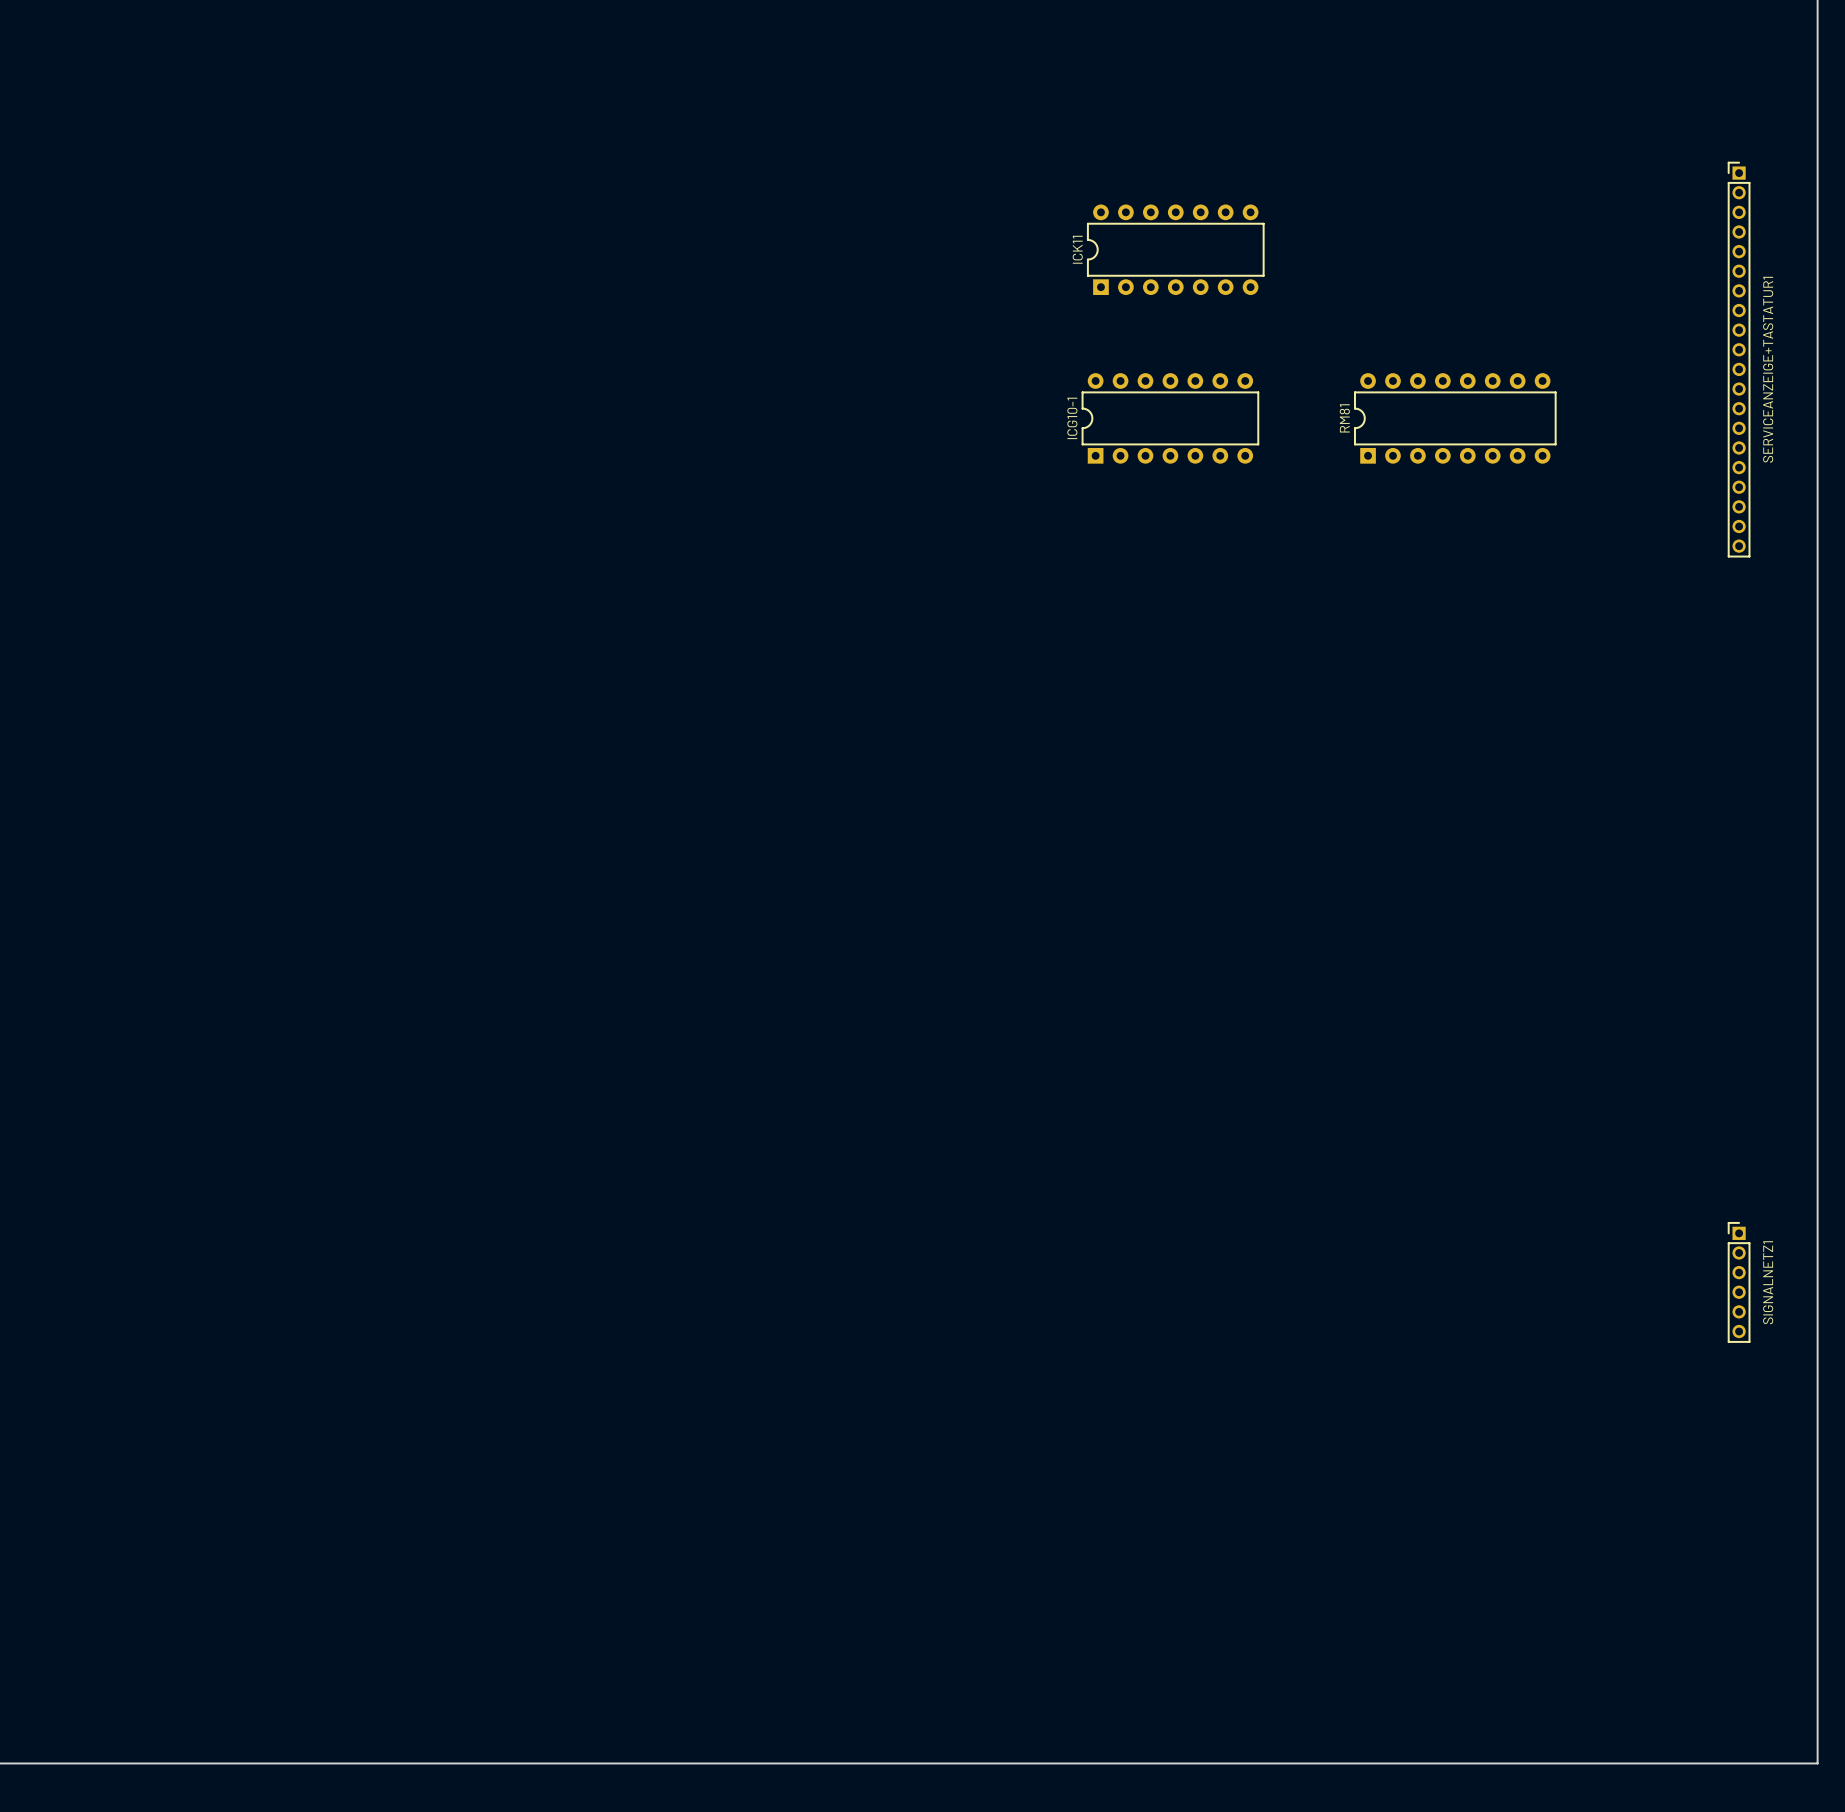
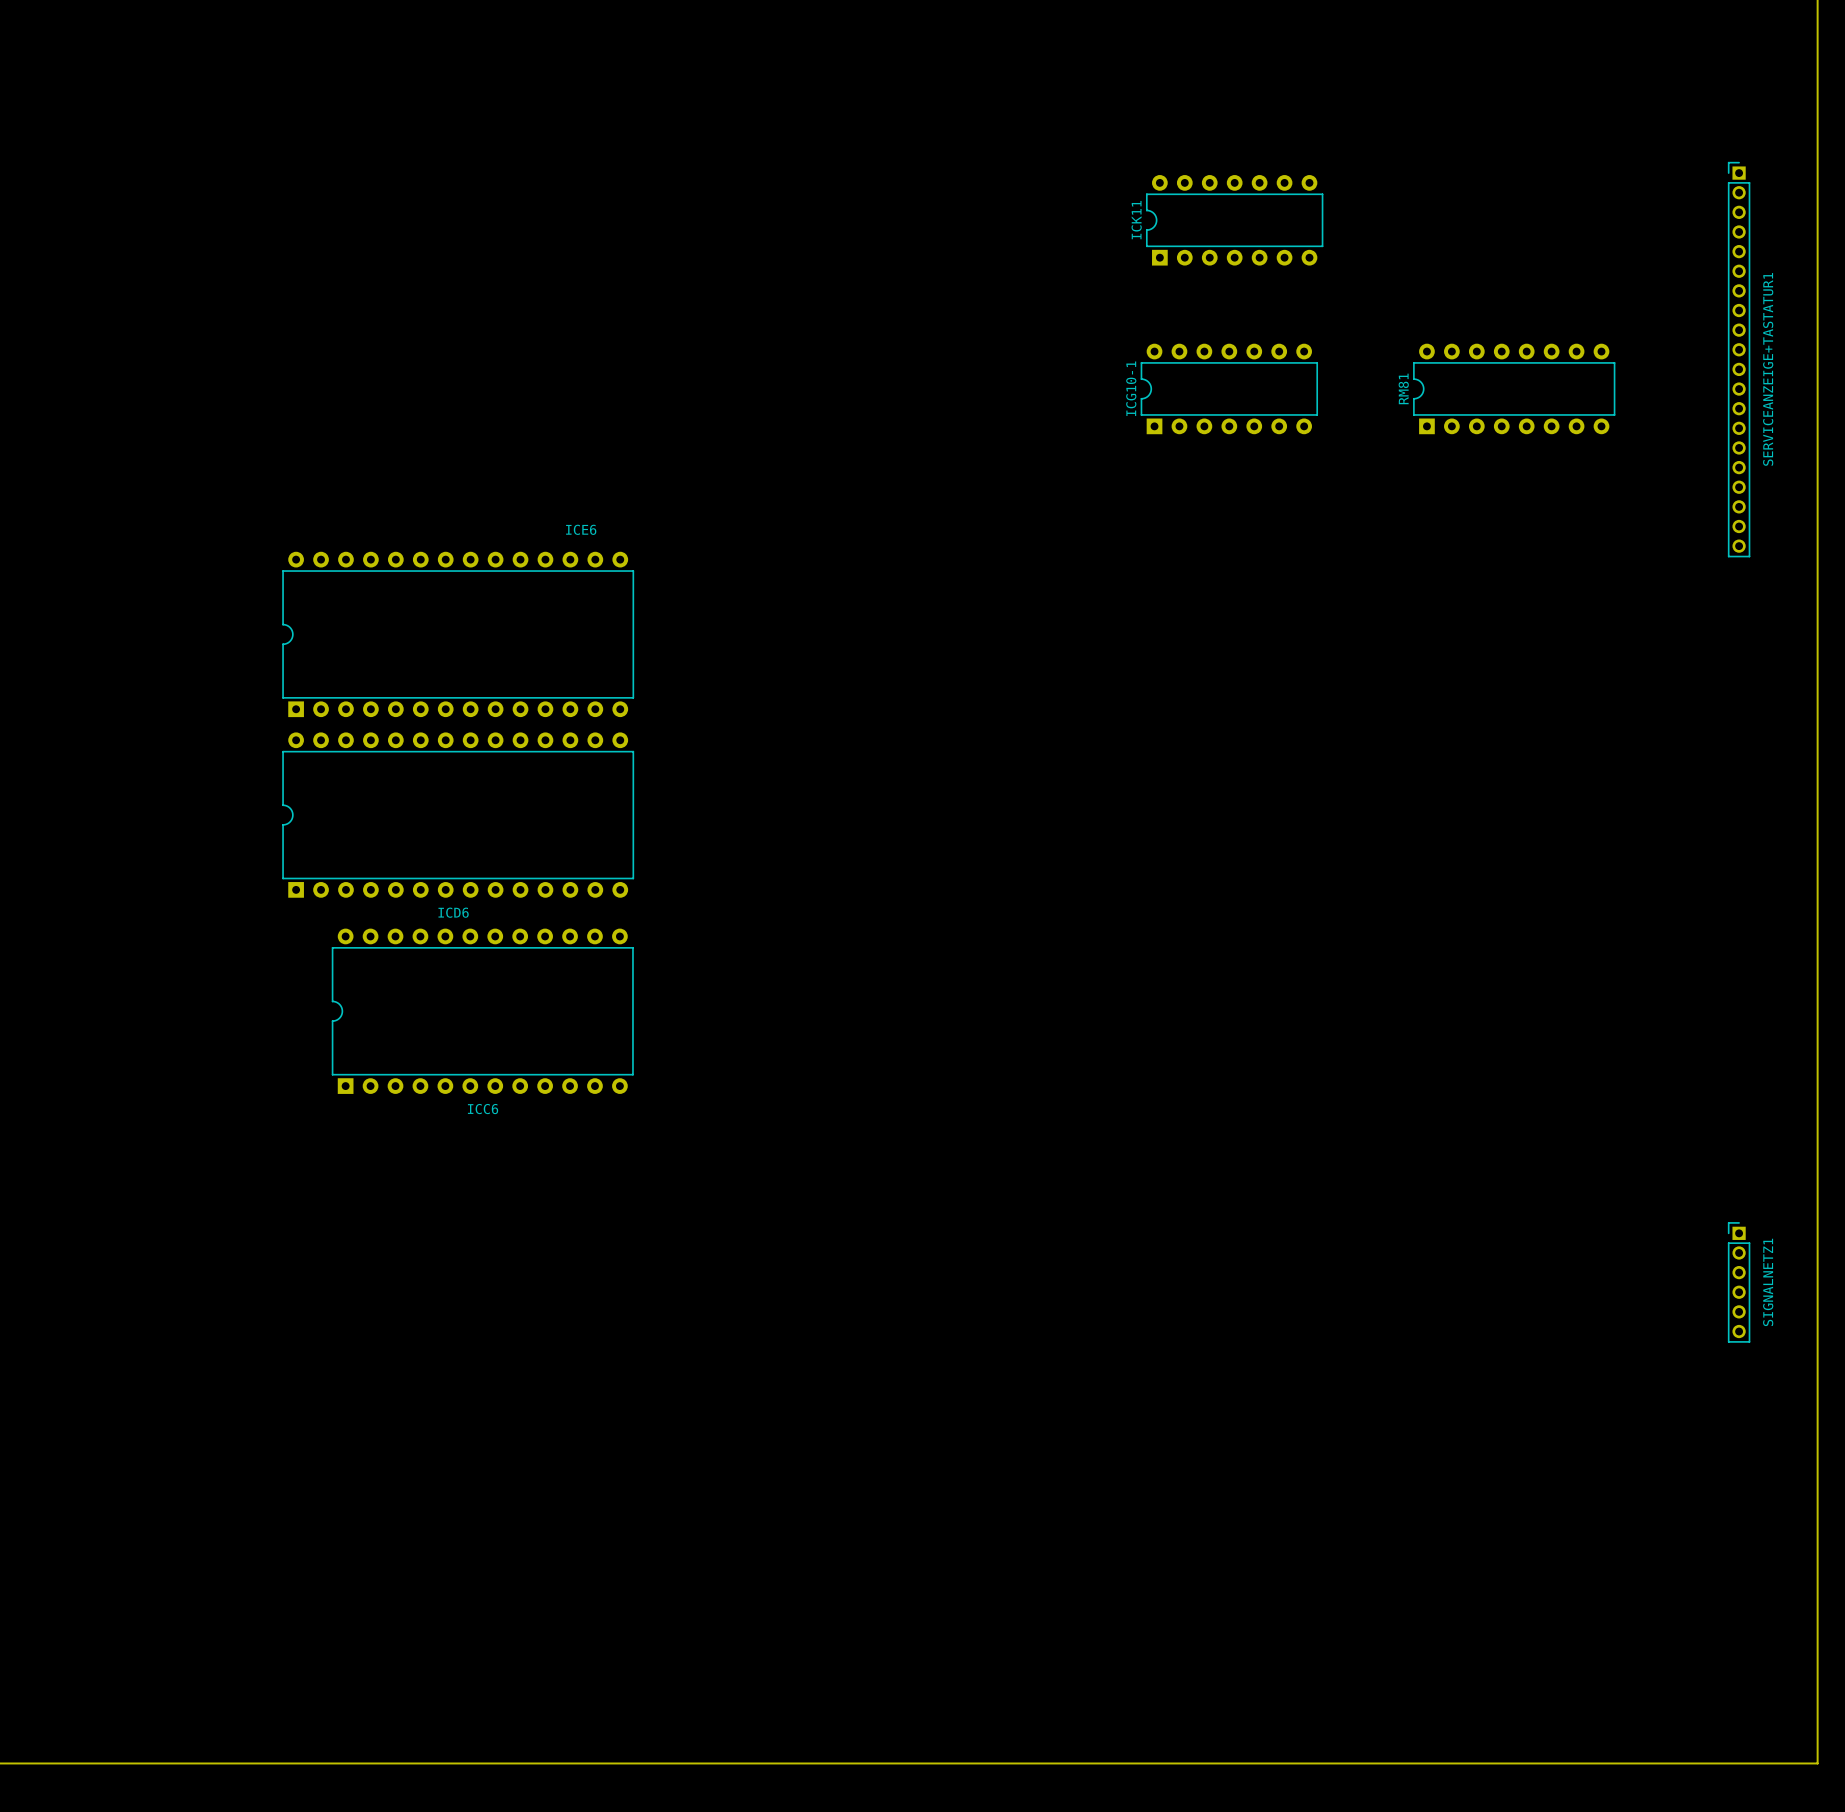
ICK11 position: (1175, 249) -> (1234, 220)
ICG10-1 position: (1170, 418) -> (1229, 388)
RM81 position: (1455, 418) -> (1514, 388)
ICE6: none -> (458, 634)
ICD6: none -> (458, 815)
ICC6: none -> (482, 1011)

